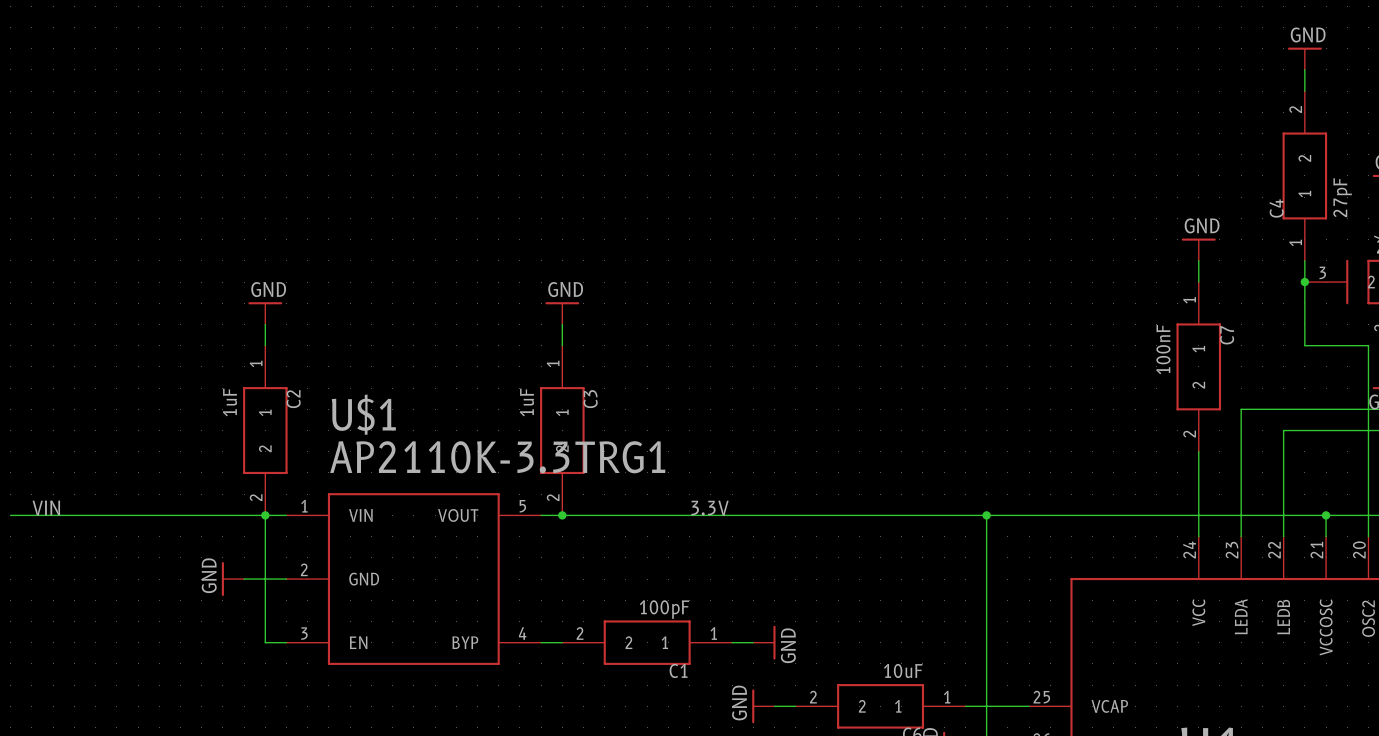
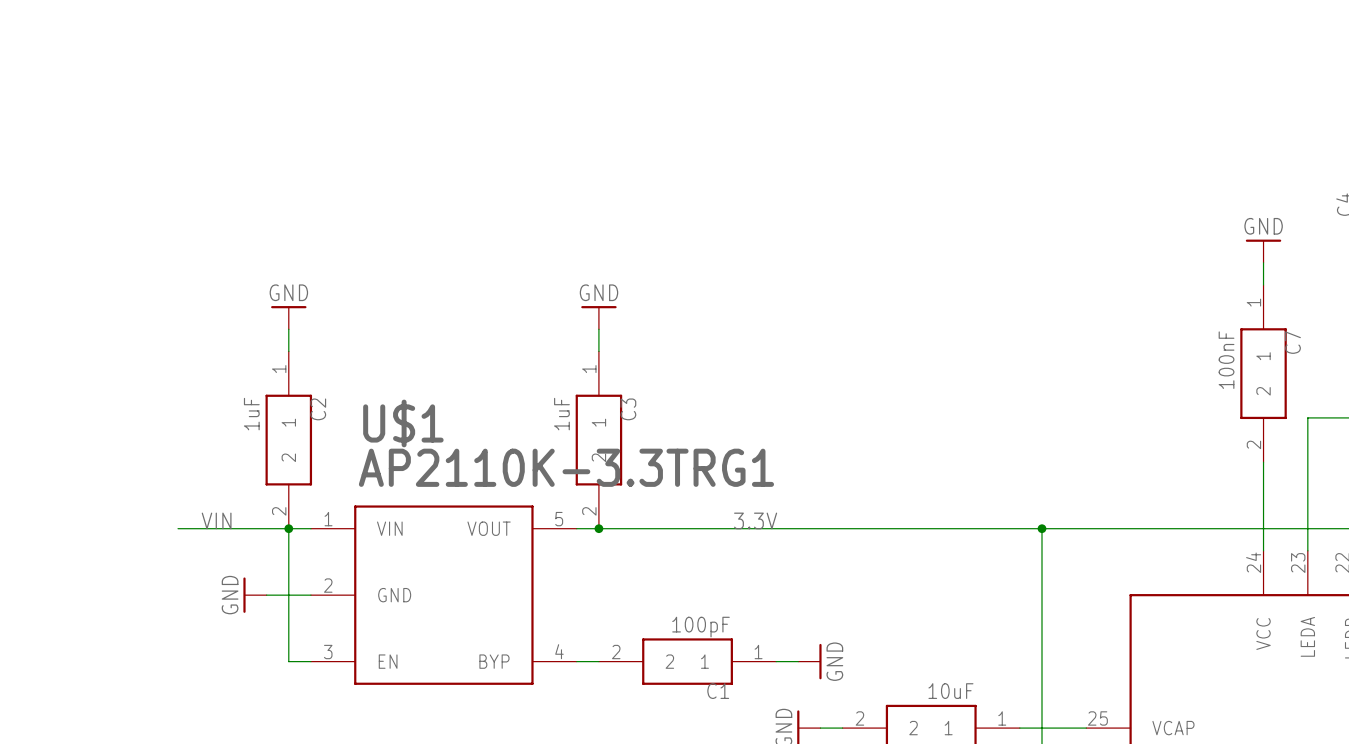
label position: VIN (46, 508) -> VIN (216, 520)
wire: (10, 515) (159, 515) -> none

